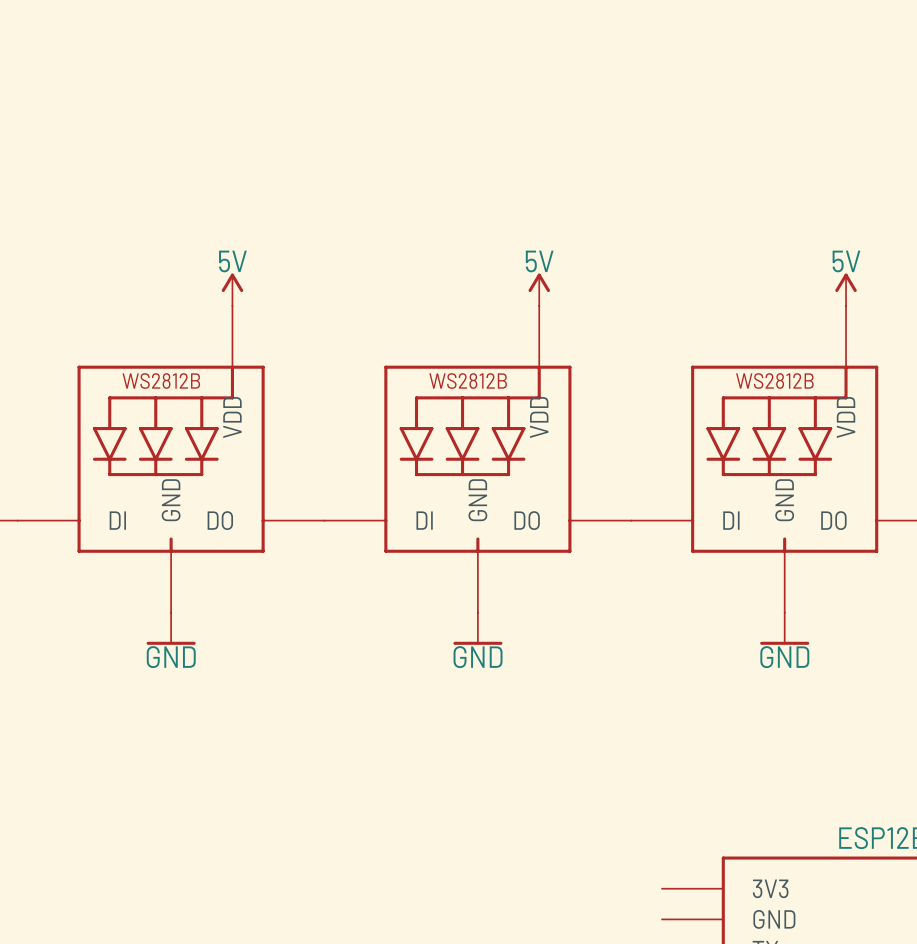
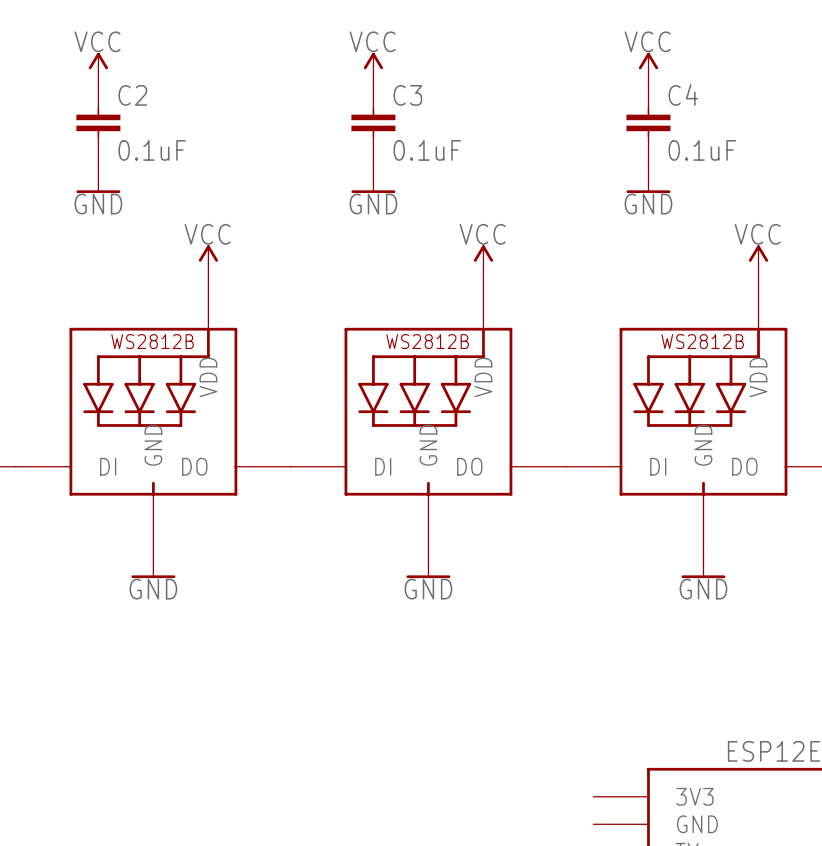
power symbol: none -> VCC (98, 67)
power symbol: none -> VCC (373, 67)
power symbol: none -> VCC (648, 67)
C2: none -> 0.1uF (98, 122)
C3: none -> 0.1uF (373, 122)
C4: none -> 0.1uF (648, 122)
power symbol: none -> GND (98, 178)
power symbol: none -> GND (373, 178)
power symbol: none -> GND (648, 178)
power symbol: 5V (232, 289) -> VCC (208, 259)
power symbol: 5V (539, 289) -> VCC (483, 259)
power symbol: 5V (846, 289) -> VCC (758, 259)

